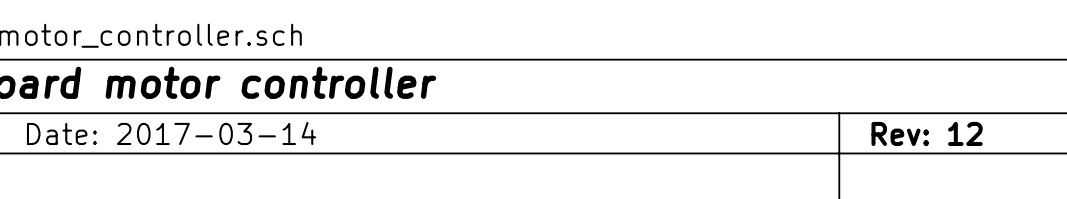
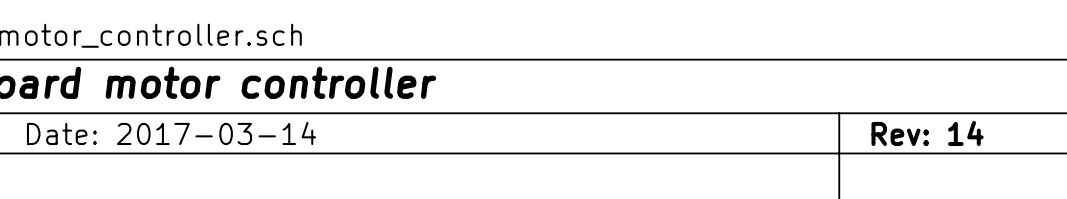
title block: Rev: 12 (927, 133) -> Rev: 14 (927, 133)

